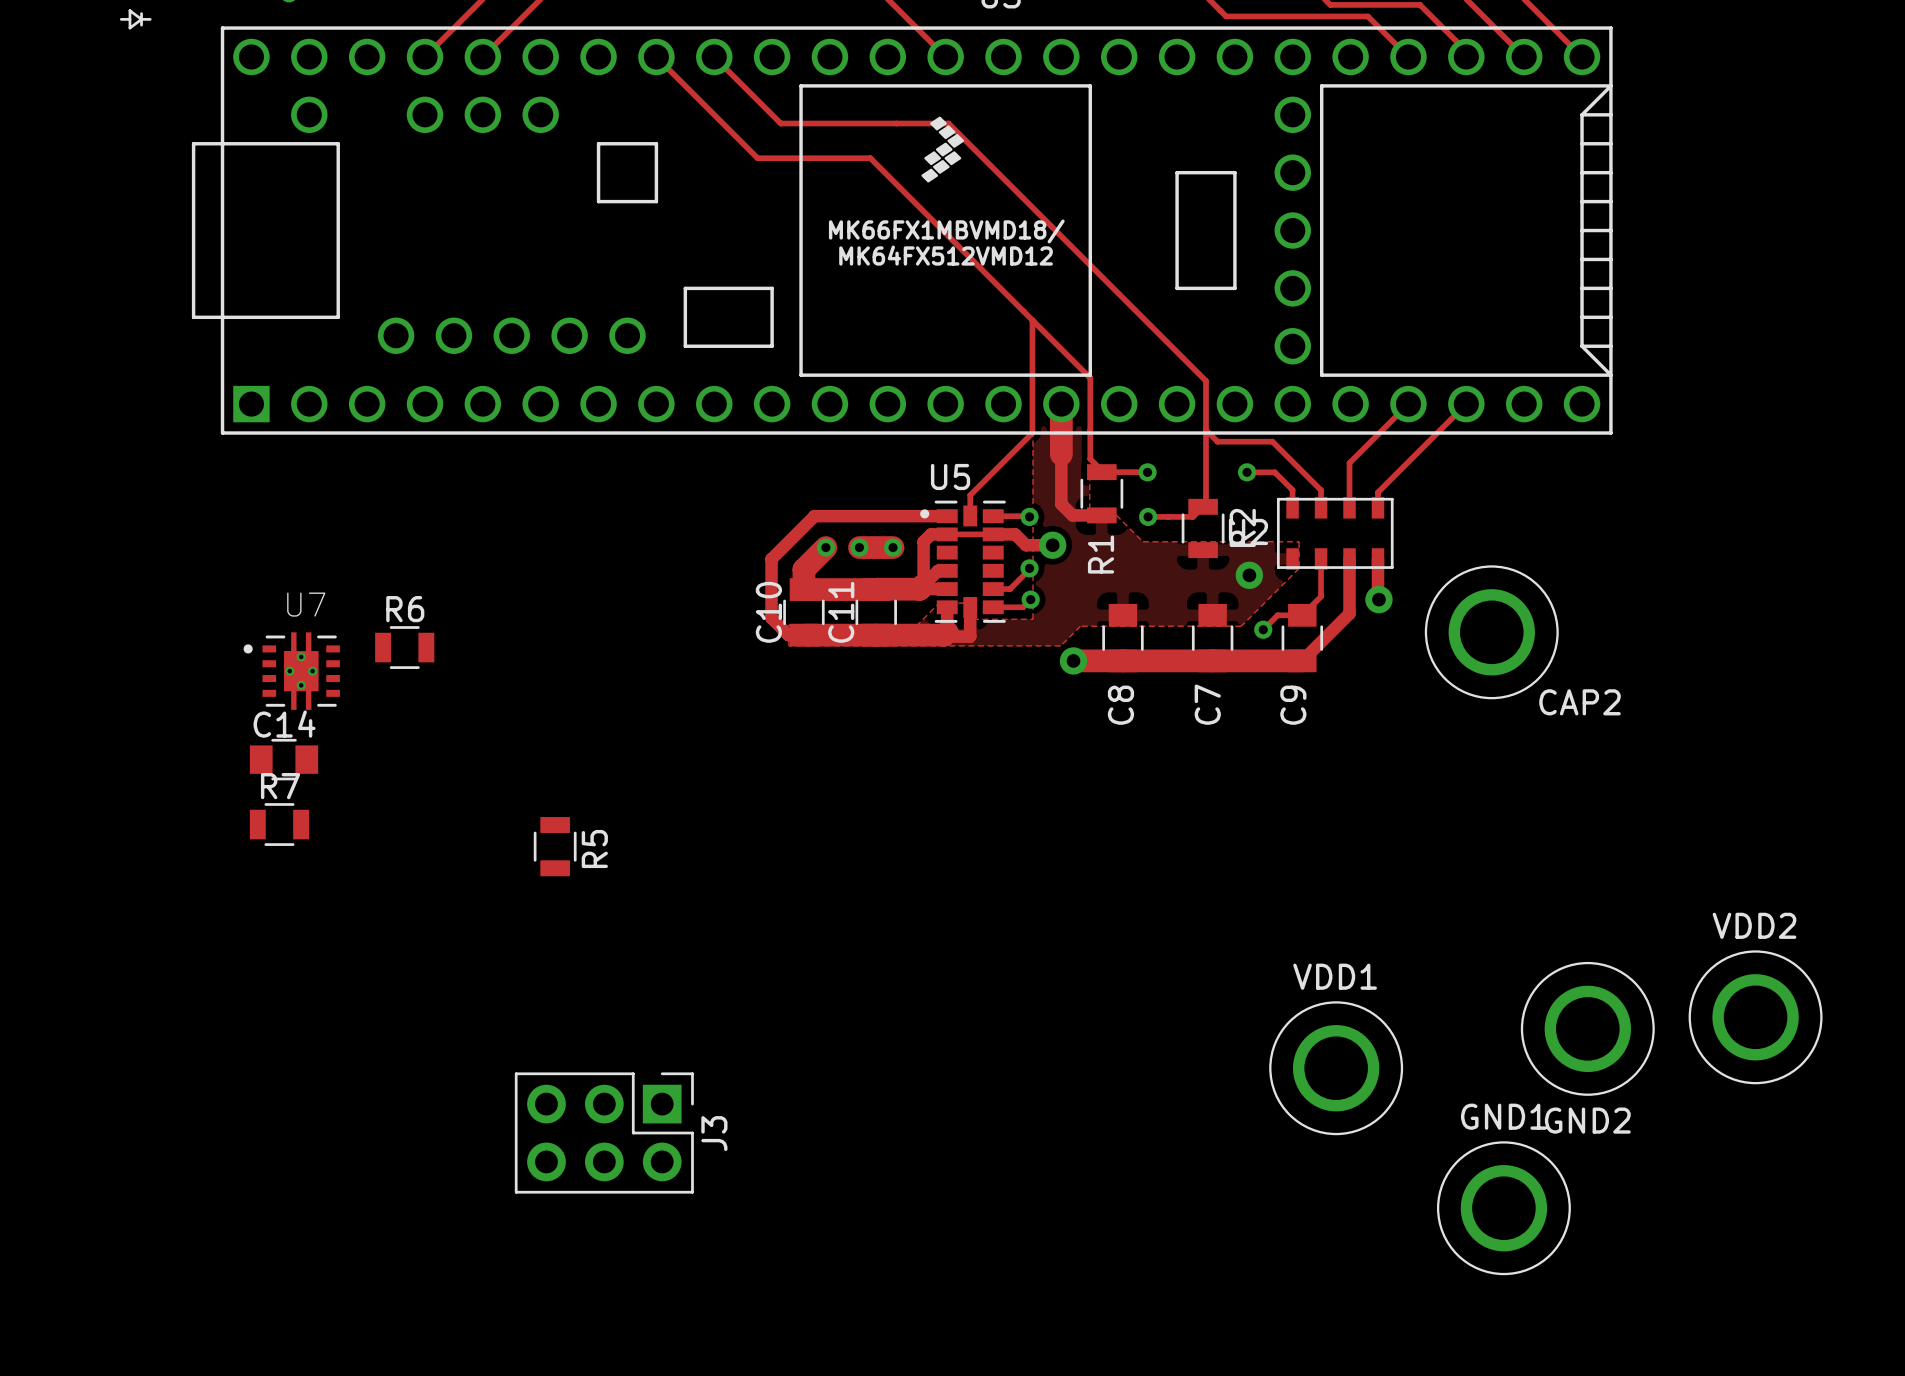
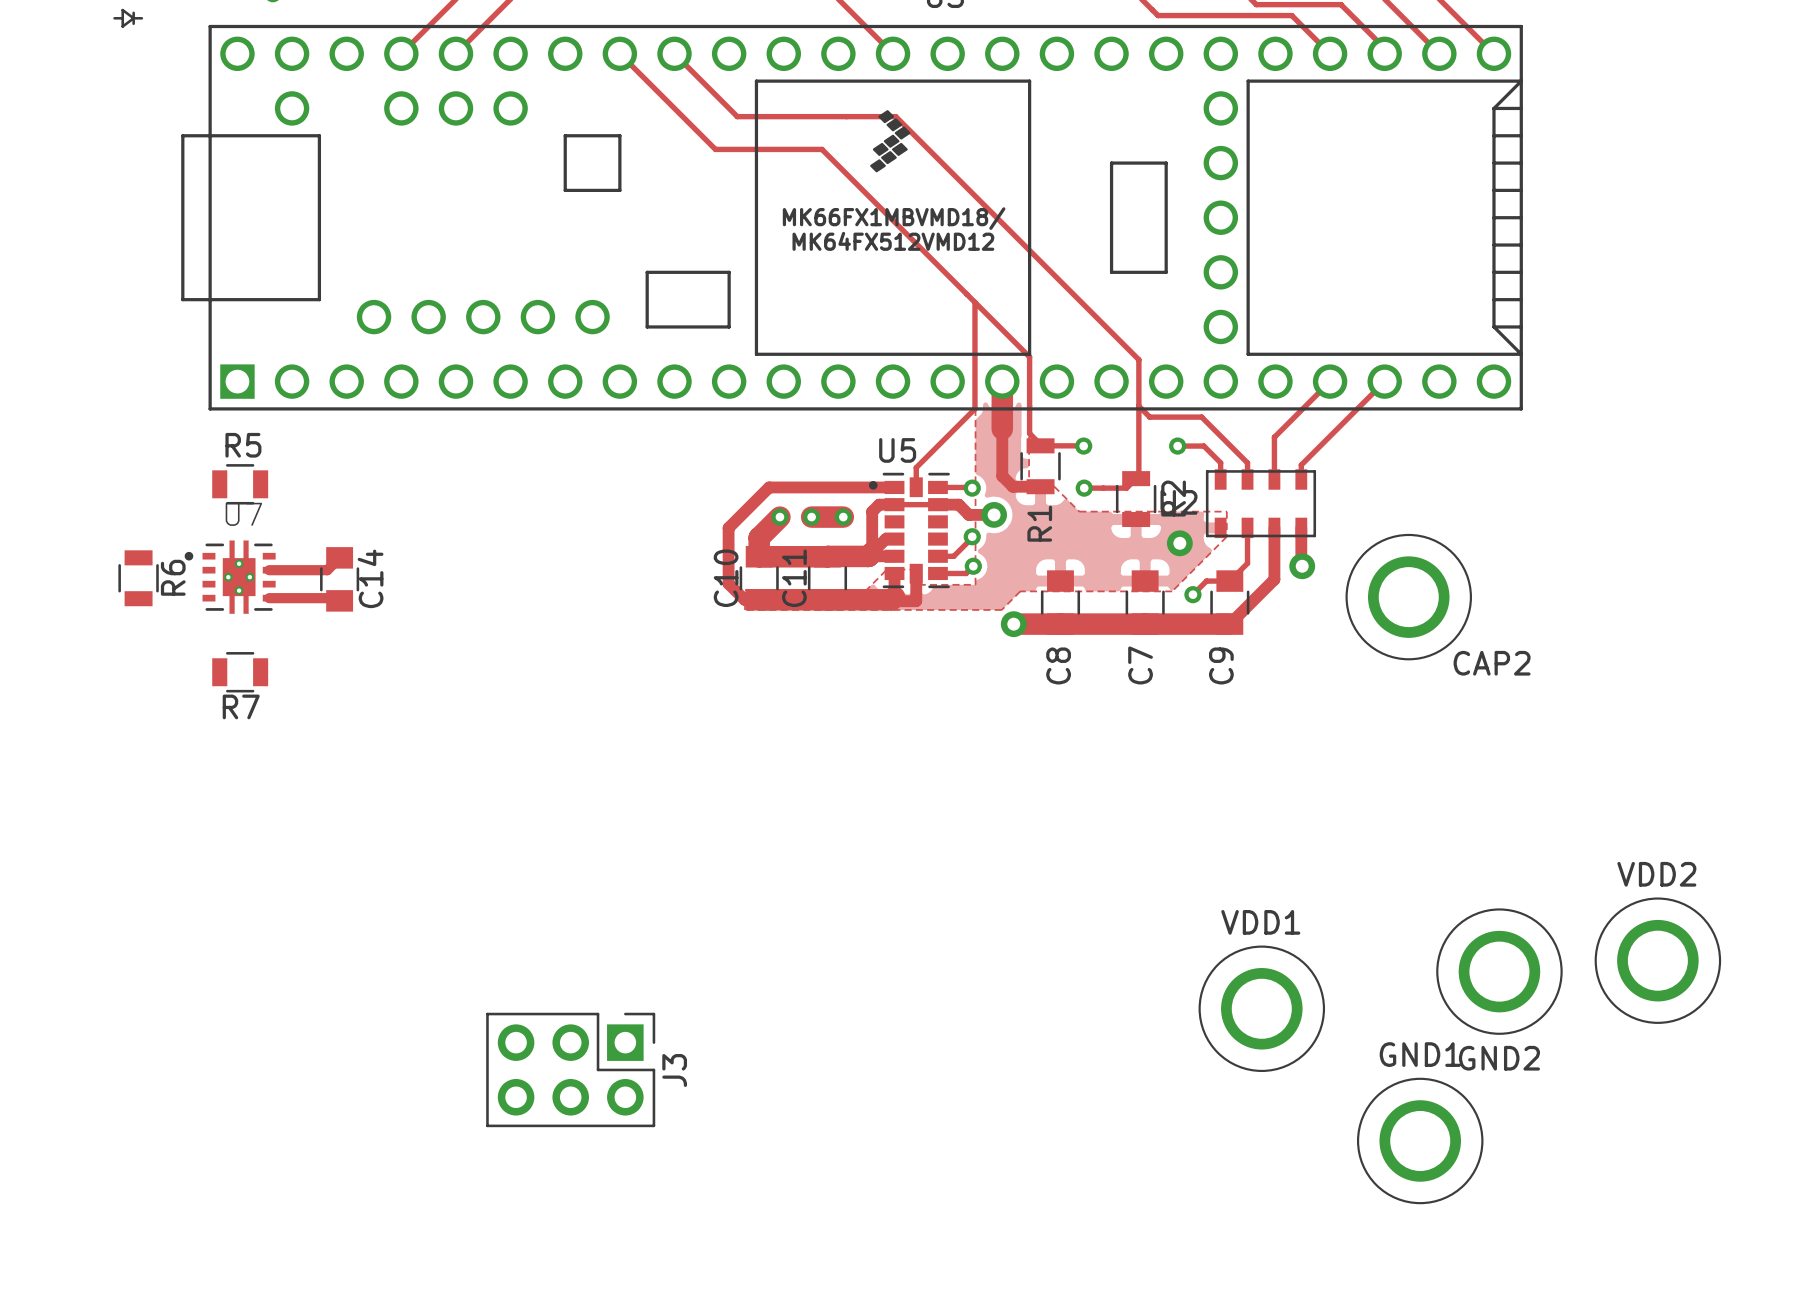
track: none -> (339, 557) (327, 570) (269, 570)
track: none -> (269, 598) (336, 598) (339, 600)
R6 rotation: 0° (404, 647) -> 90° clockwise (138, 578)
R6 position: (404, 647) -> (138, 578)
U7 position: (291, 671) -> (230, 577)
C14 rotation: 0° (284, 759) -> 90° clockwise (339, 579)
C14 position: (284, 759) -> (339, 579)
R7 name position: R7 (280, 786) -> R7 (241, 706)
R7 position: (279, 824) -> (240, 672)
R5 rotation: 0° (555, 846) -> 90° clockwise (240, 484)
R5 position: (555, 846) -> (240, 484)
R5 name position: R5 (594, 849) -> R5 (243, 445)

